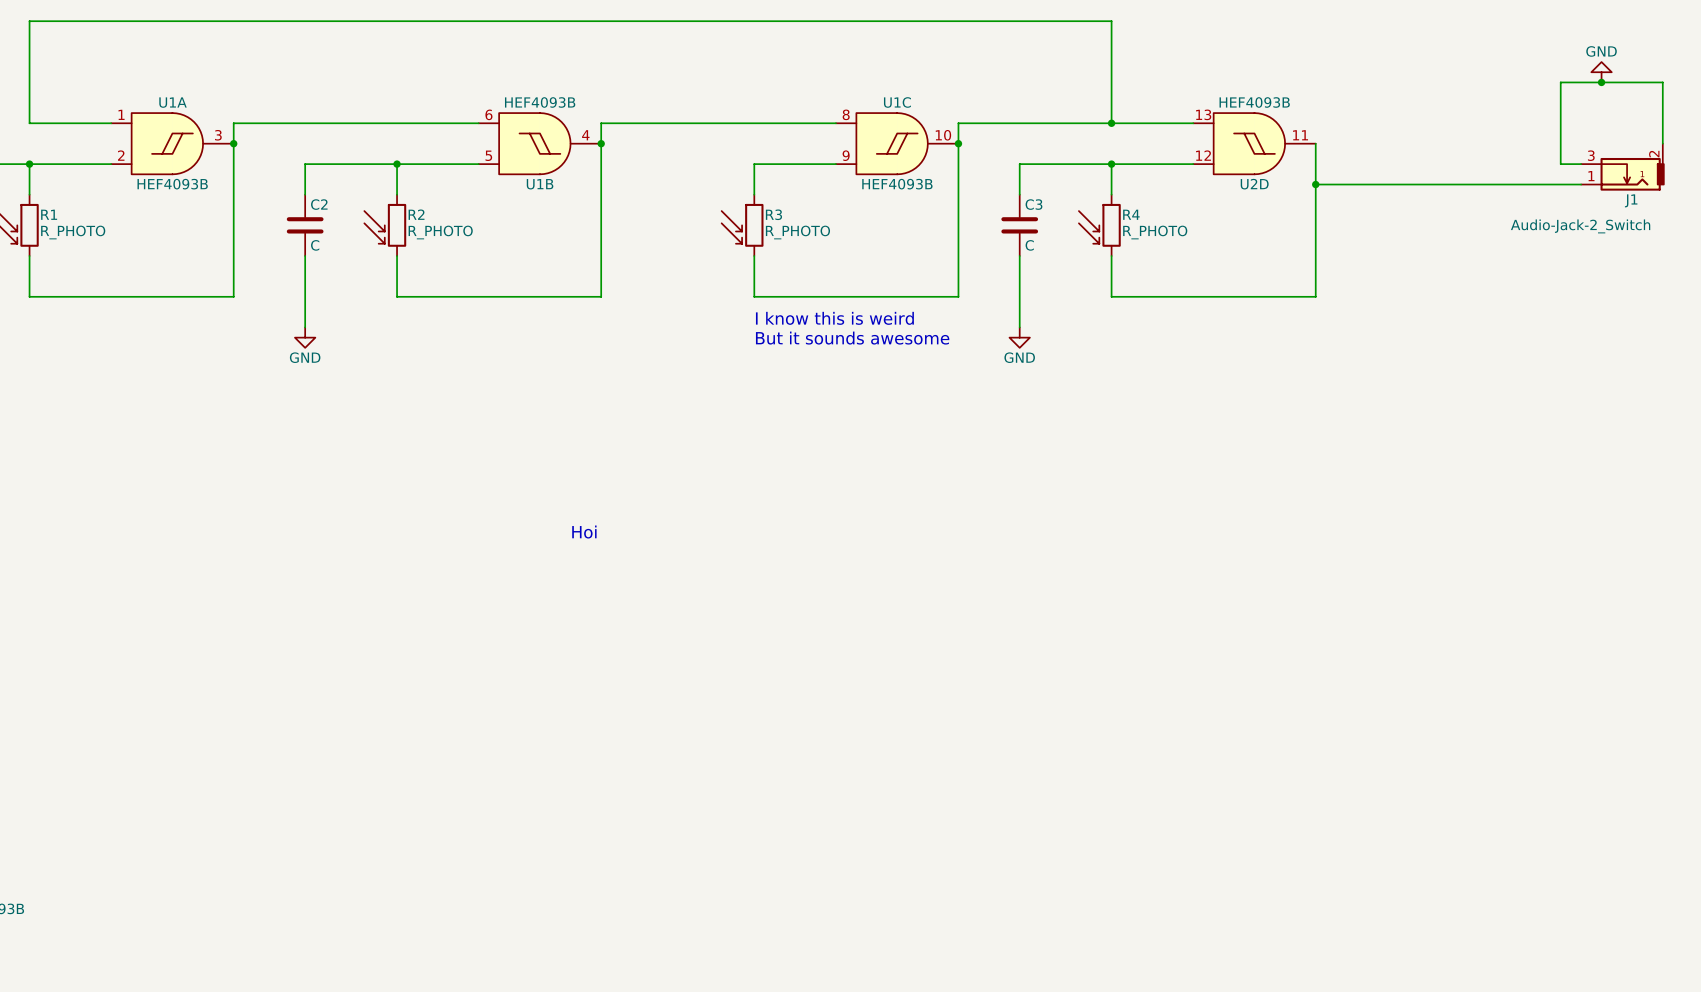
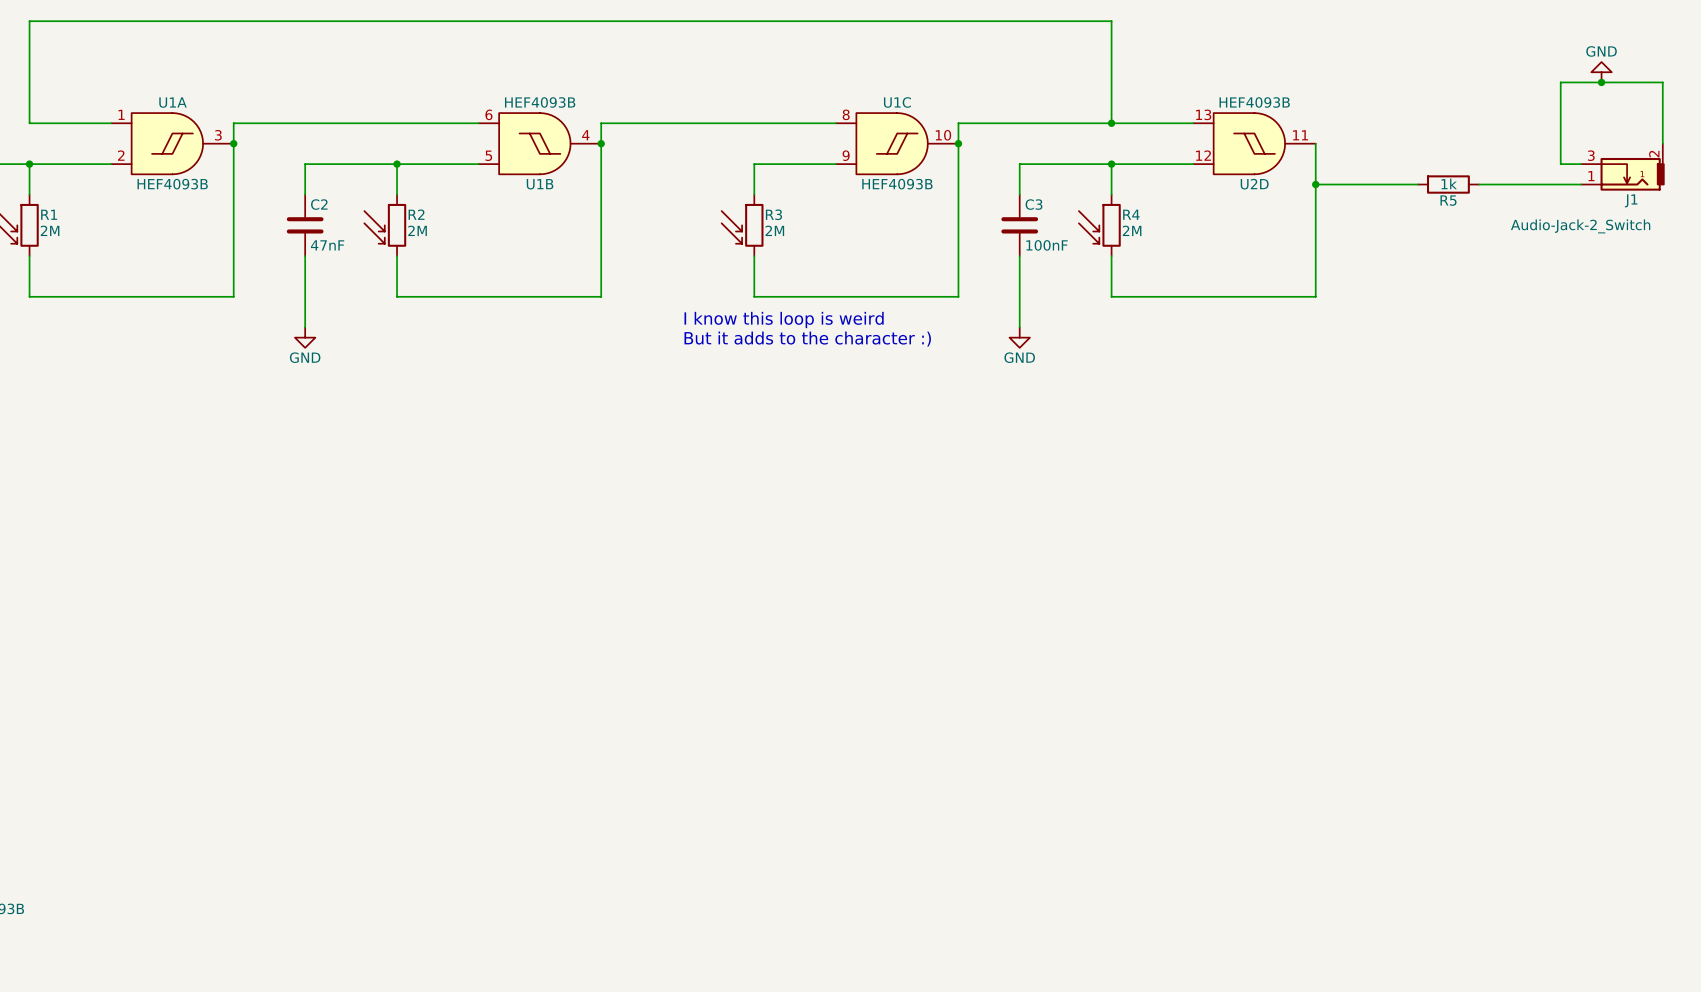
wire: (1417, 184) (1479, 184) -> none
R5: none -> 1k (1448, 184)
R1 value: R_PHOTO (73, 232) -> 2M (50, 230)
R2 value: R_PHOTO (440, 232) -> 2M (417, 230)
R3 value: R_PHOTO (797, 232) -> 2M (774, 230)
R4 value: R_PHOTO (1155, 232) -> 2M (1132, 230)
C2 value: C (315, 245) -> 47nF (327, 245)
C3 value: C (1029, 245) -> 100nF (1047, 245)
text: I know this is weird (834, 318) -> I know this loop is weird (784, 319)
text: But it sounds awesome (852, 338) -> none
text: none -> But it adds to the character :) (807, 339)
text: Hoi (584, 532) -> none

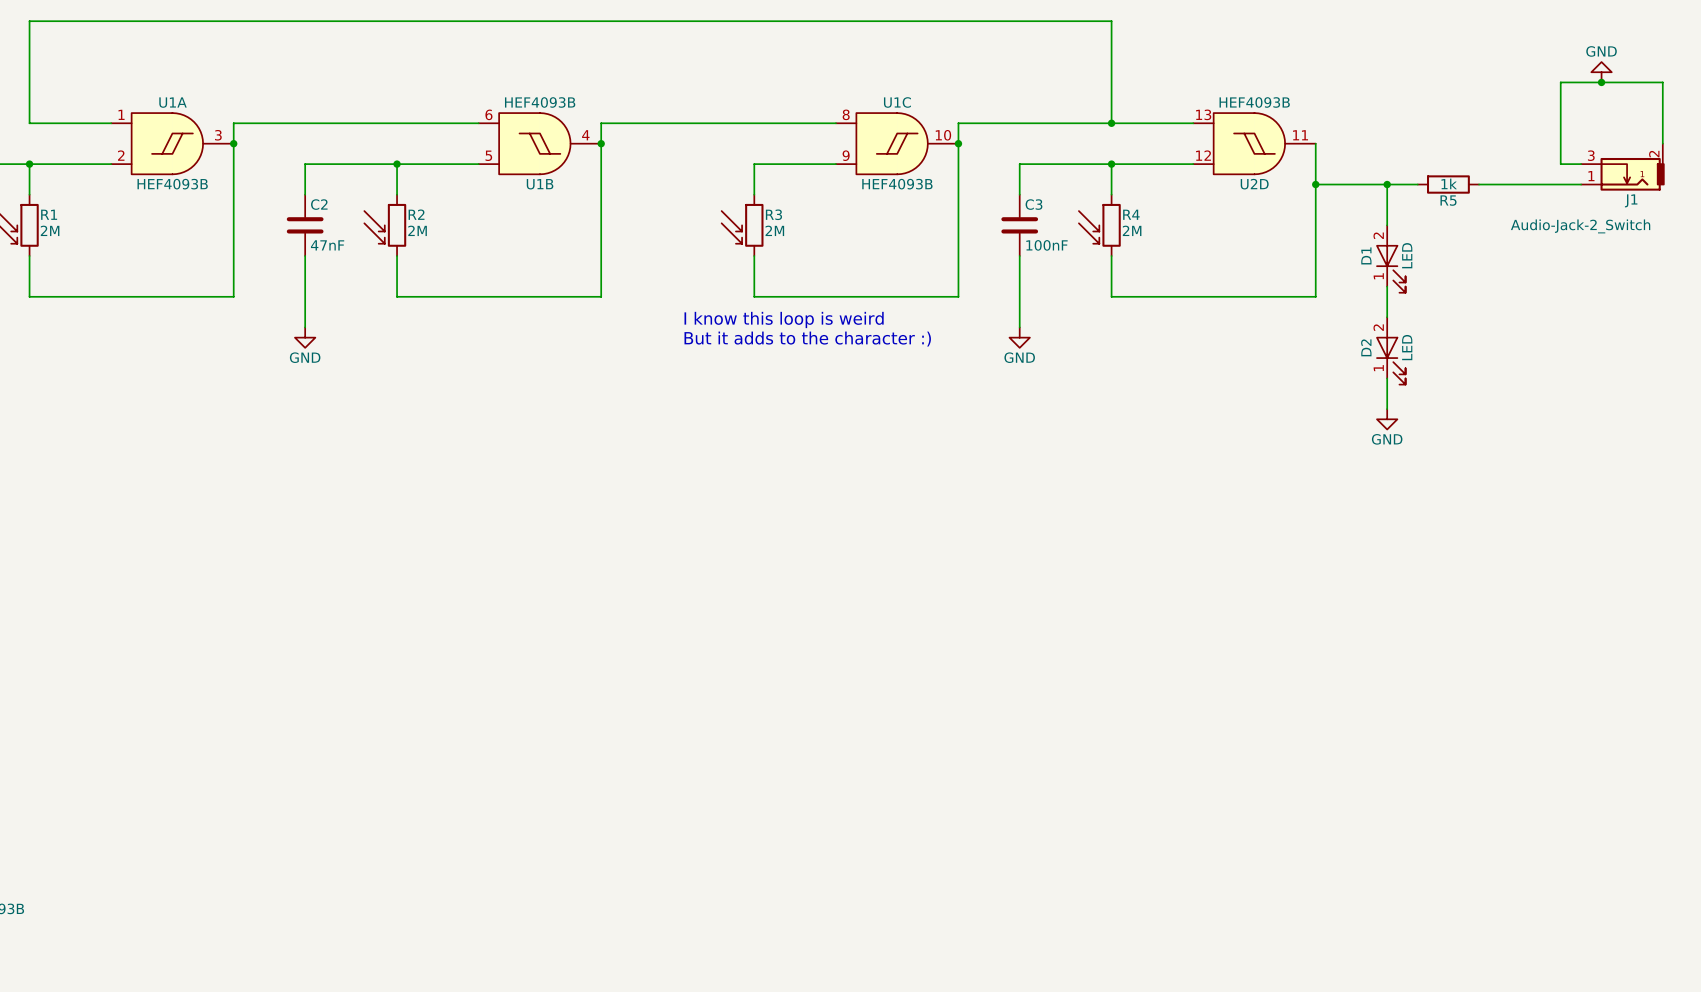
wire: none -> (1387, 184) (1387, 225)
junction: none -> (1387, 184)
D1: none -> LED (1390, 259)
wire: none -> (1387, 286) (1387, 317)
D2: none -> LED (1390, 350)
wire: none -> (1387, 378) (1387, 409)
power symbol: none -> GND (1387, 419)

